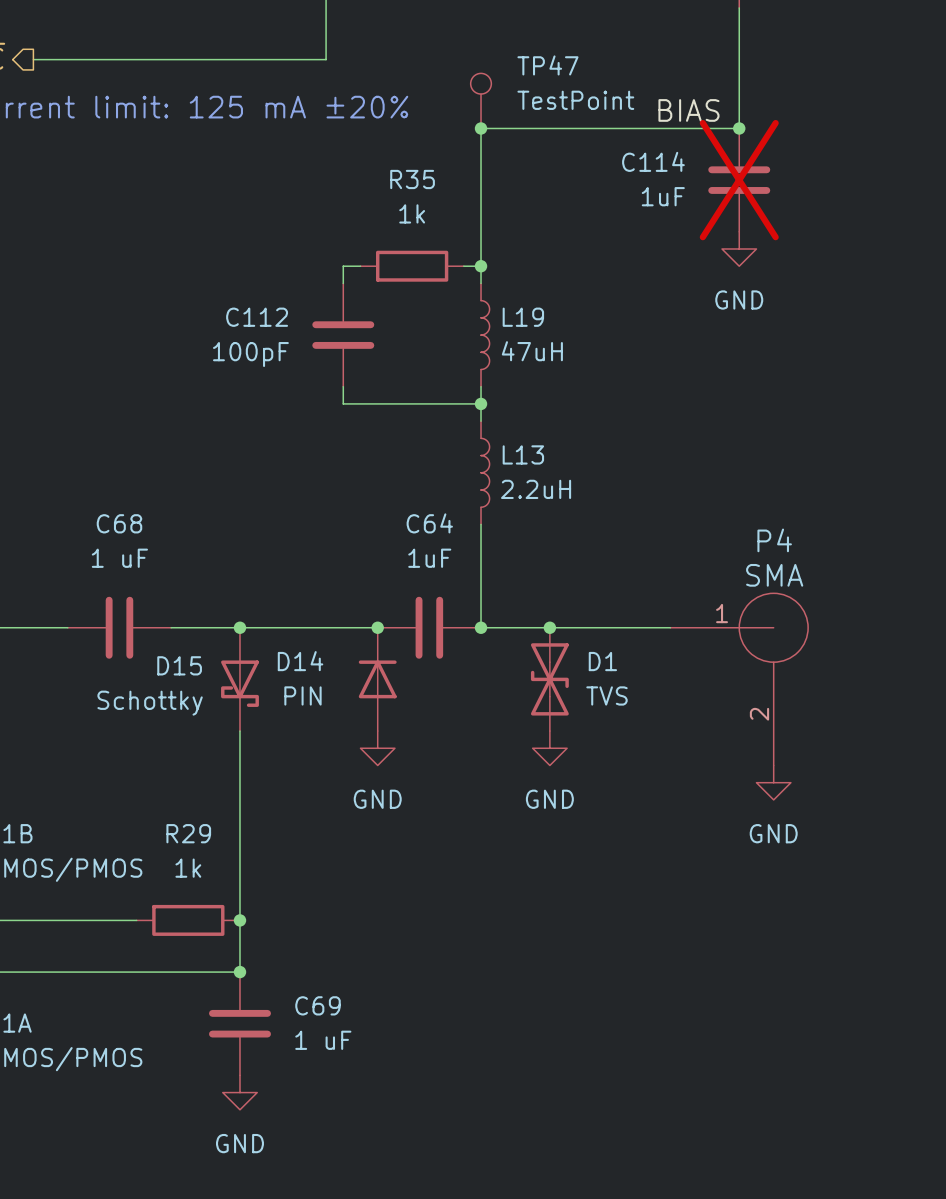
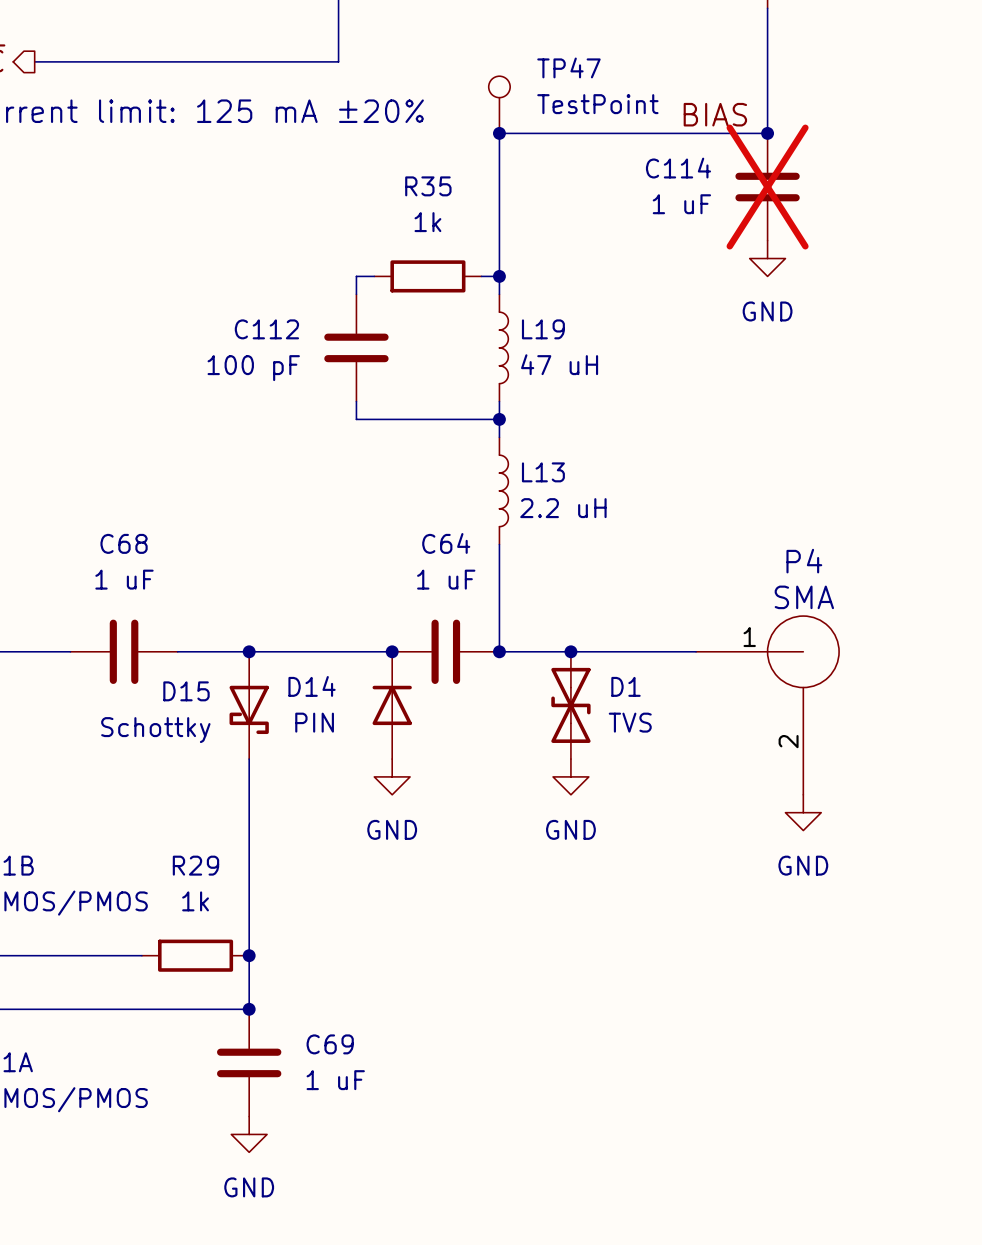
C114 value: 1uF (663, 196) -> 1 uF (681, 204)
L19 value: 47uH (532, 351) -> 47 uH (559, 364)
C112 value: 100pF (250, 354) -> 100 pF (253, 368)
L13 value: 2.2uH (536, 489) -> 2.2 uH (563, 508)
C64 value: 1uF (429, 558) -> 1 uF (446, 579)

